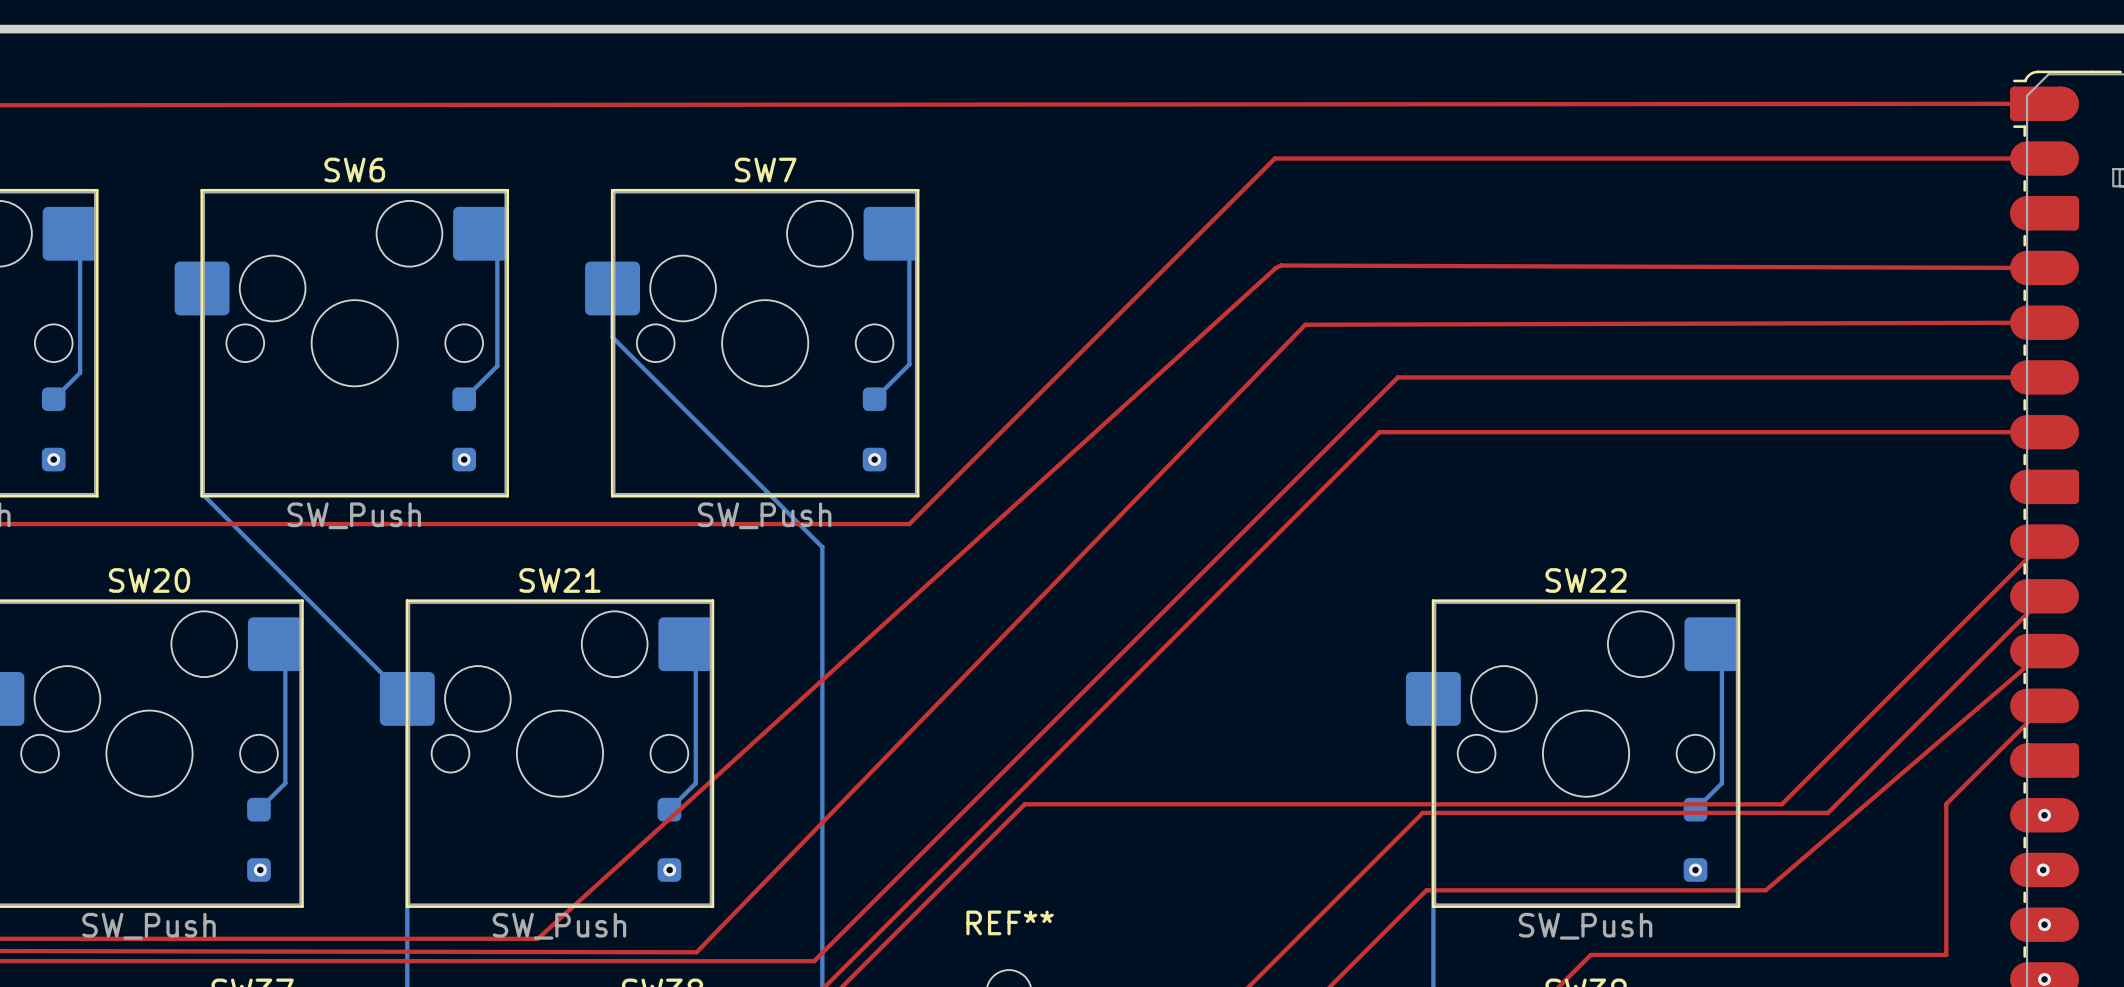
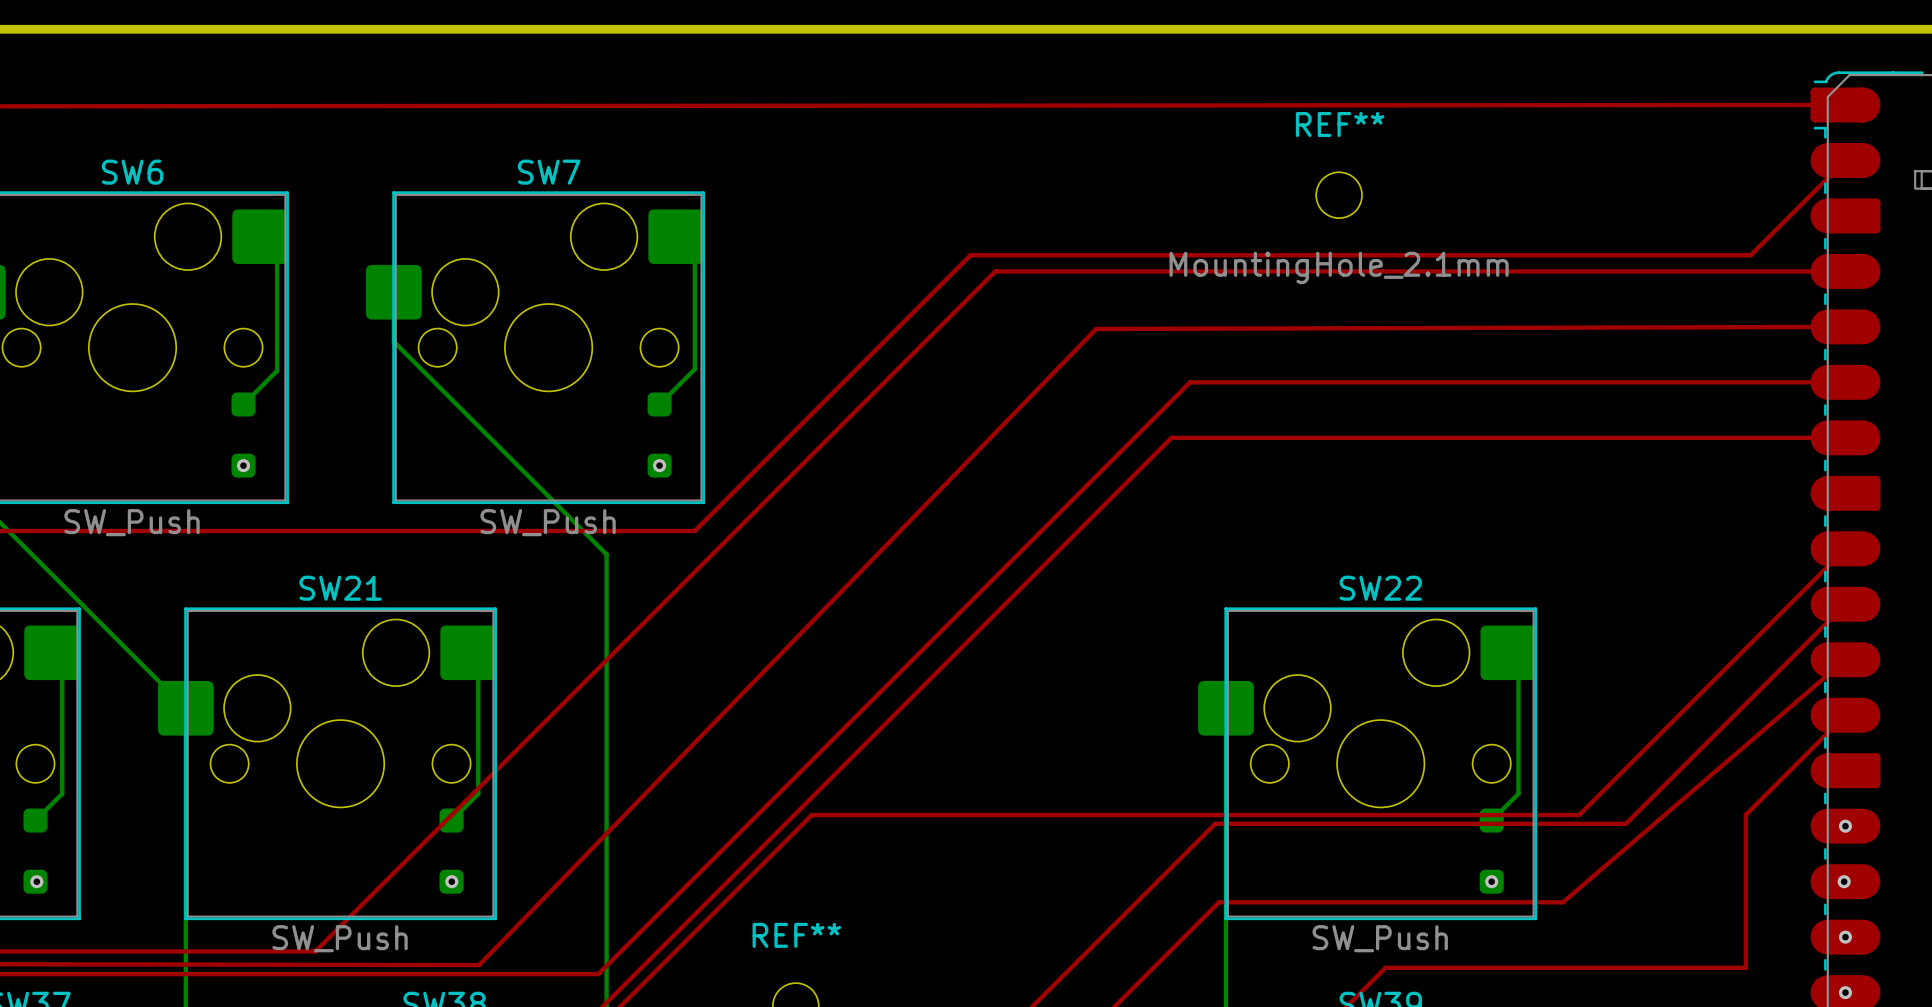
top track: (2044, 158) (1274, 158) (1181, 252) -> (1845, 160) (1750, 255) (970, 255)
REF**: none -> MountingHole_2.1mm (1339, 195)
top track: (2044, 267) (1280, 265) (537, 938) (535, 938) -> (1845, 271) (995, 271) (315, 951)

